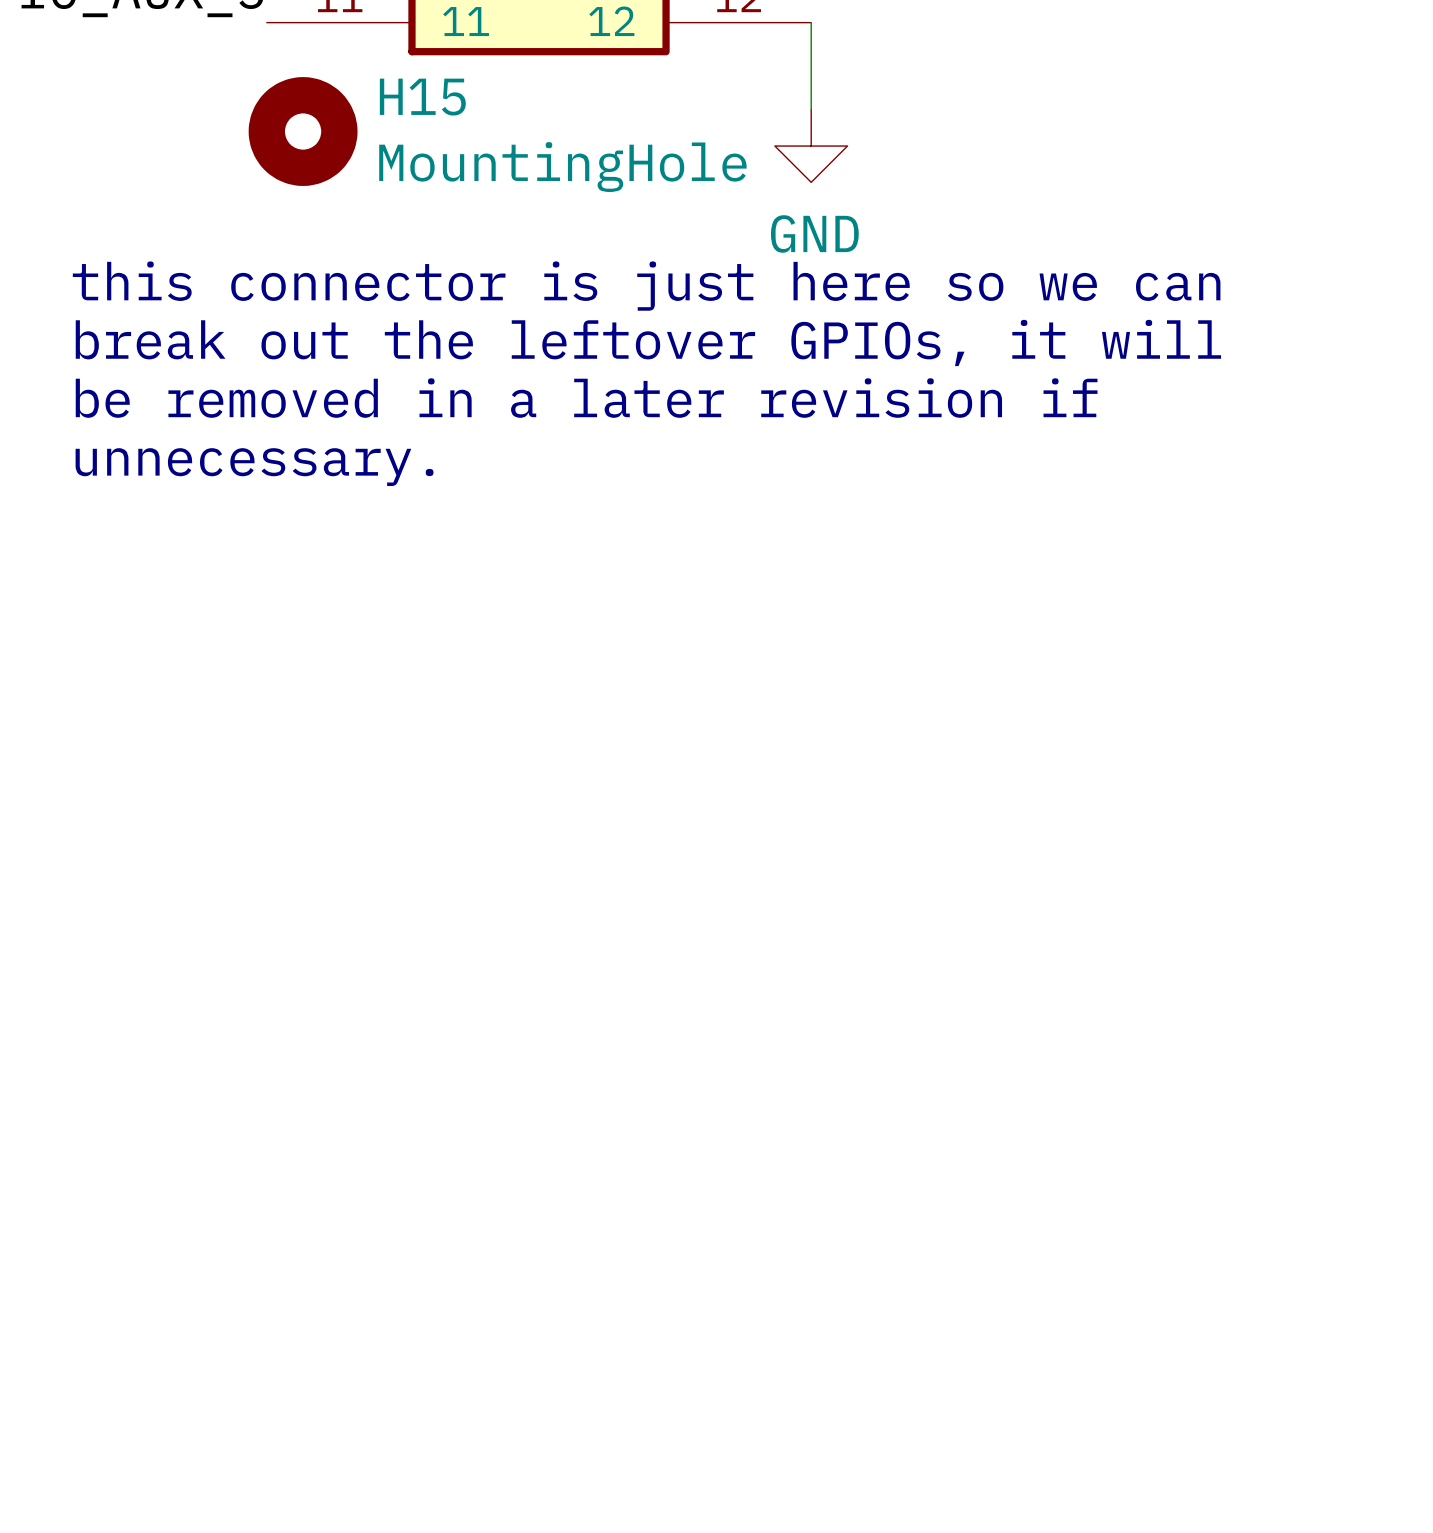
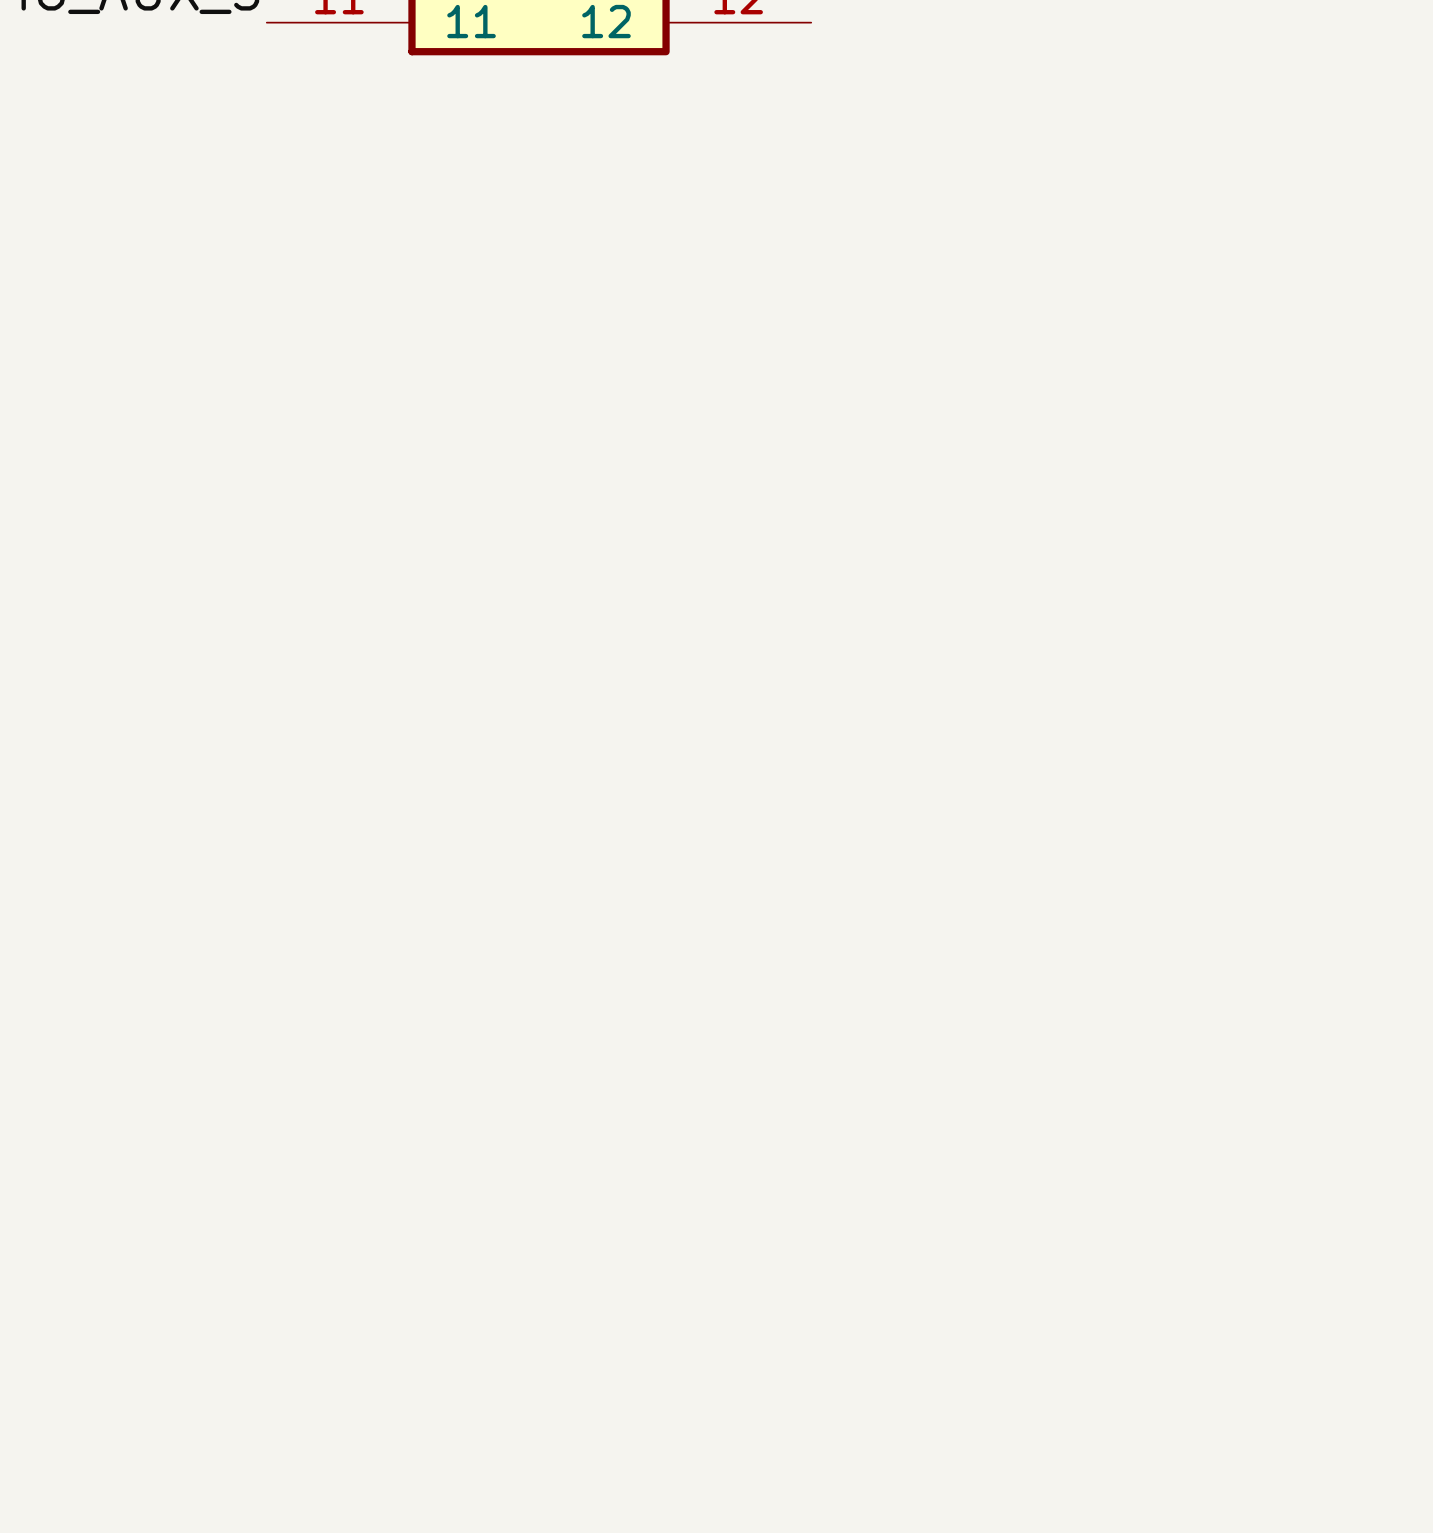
wire: (811, 22) (811, 109) -> none
H15: MountingHole (303, 131) -> none
power symbol: GND (811, 146) -> none
text: this connector is just here so we can (646, 286) -> none
text: break out the leftover GPIOs, it will (648, 342) -> none
text: be removed in a later revision if (586, 398) -> none
text: unnecessary. (254, 467) -> none

